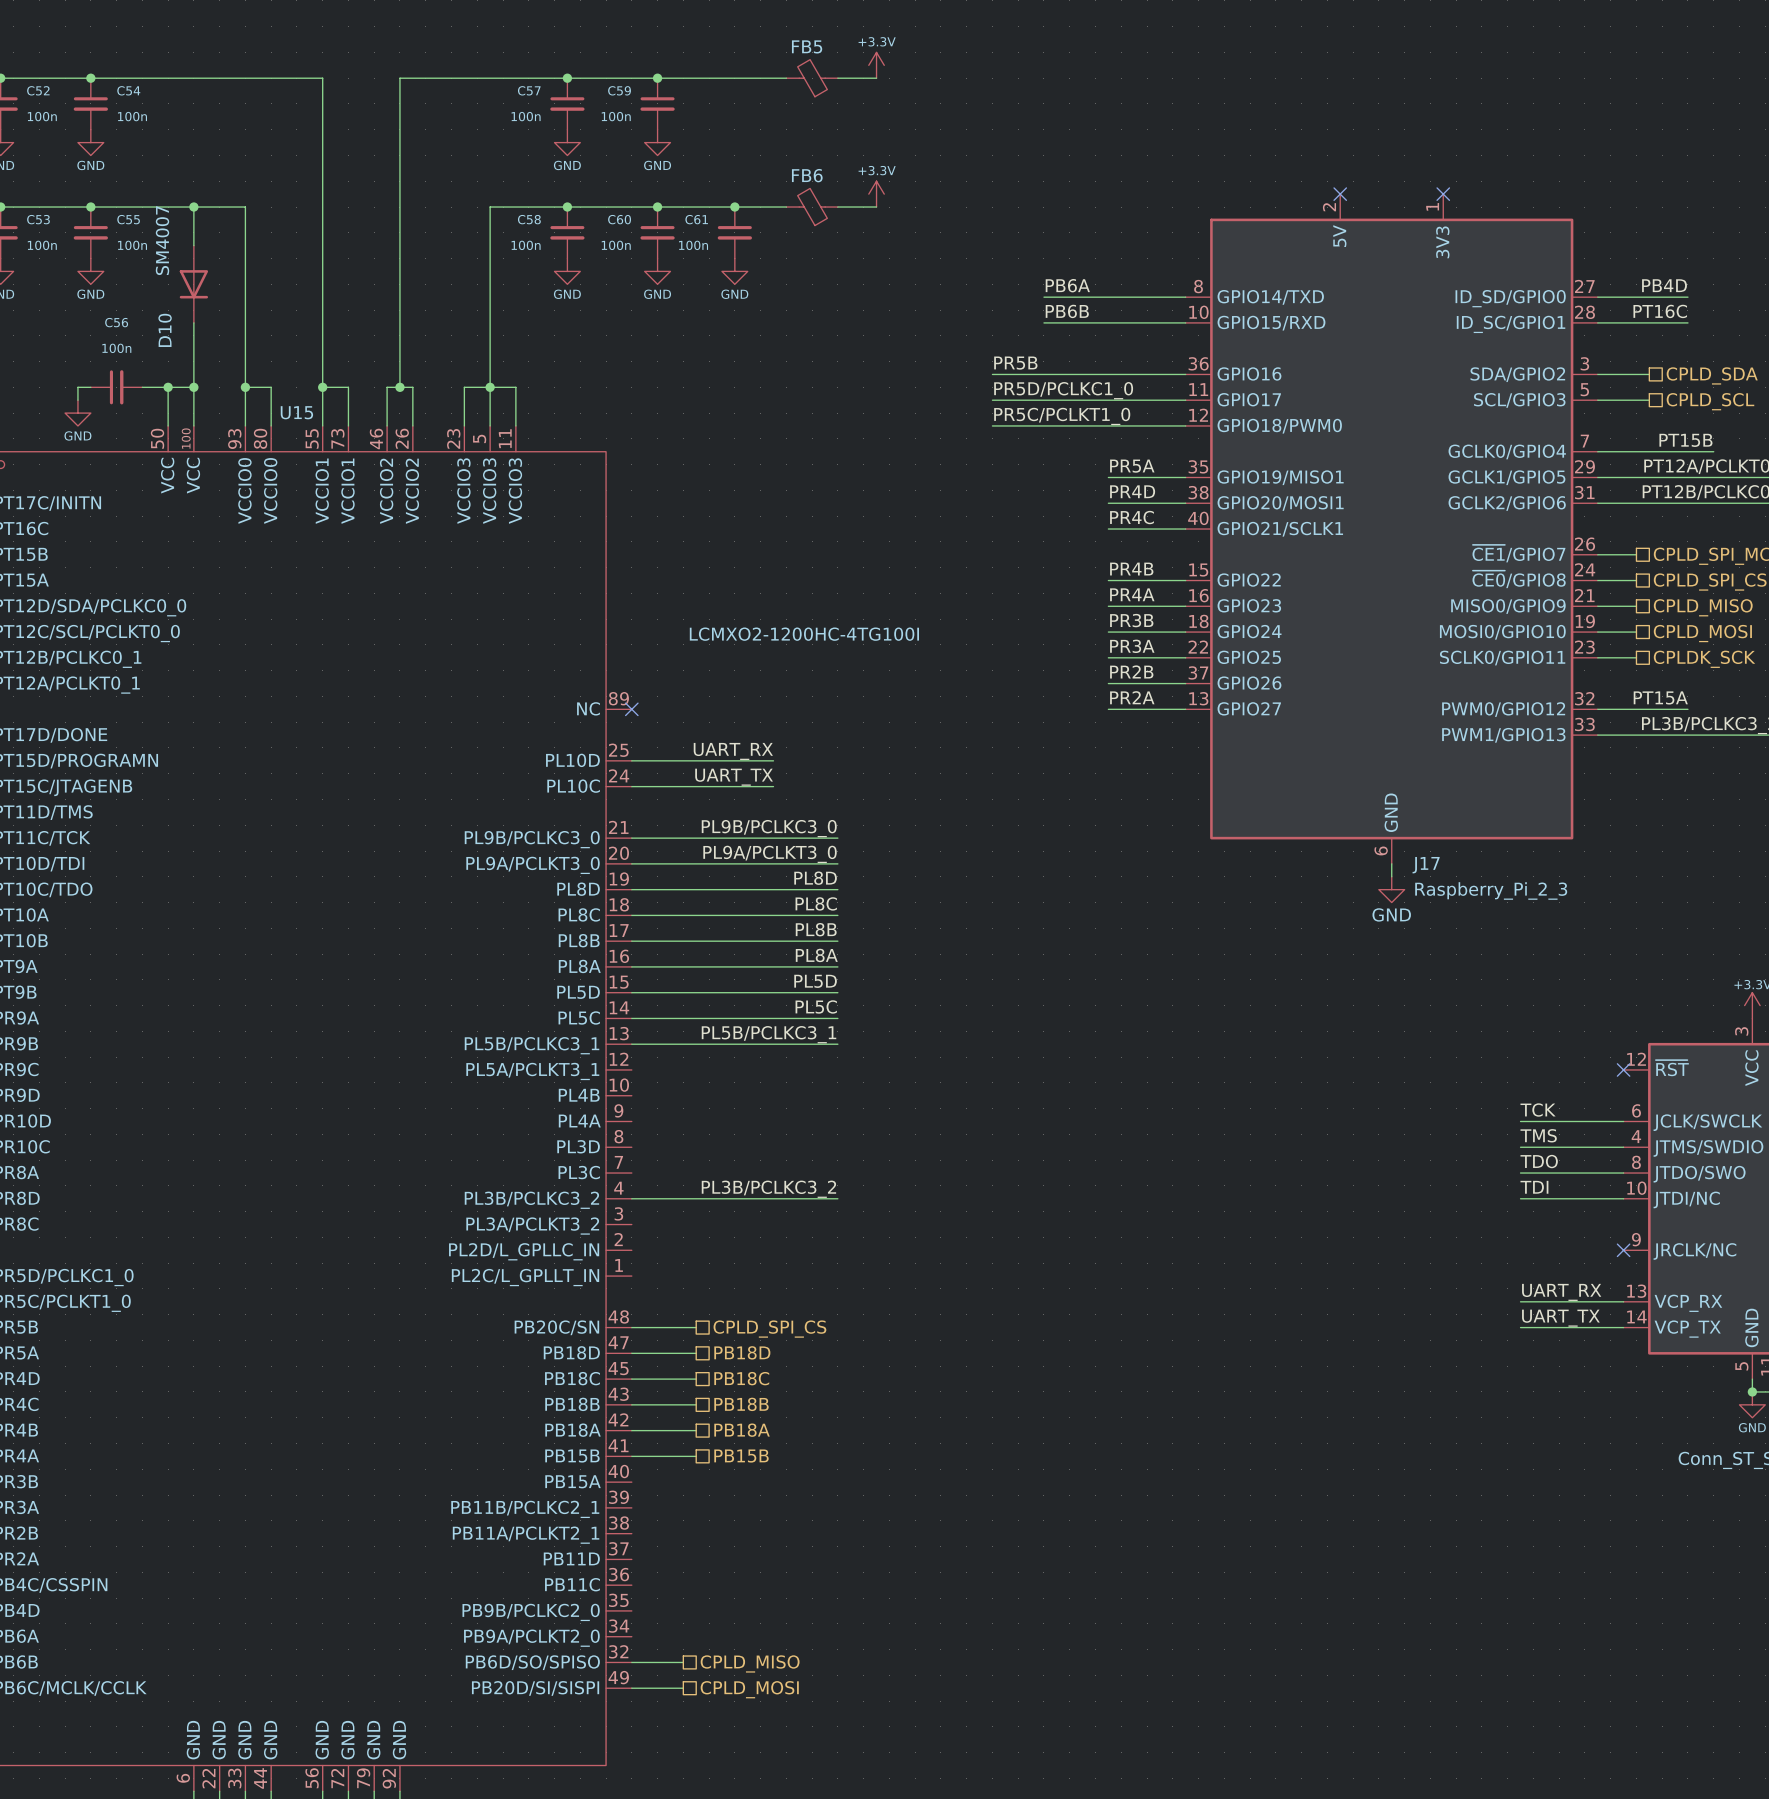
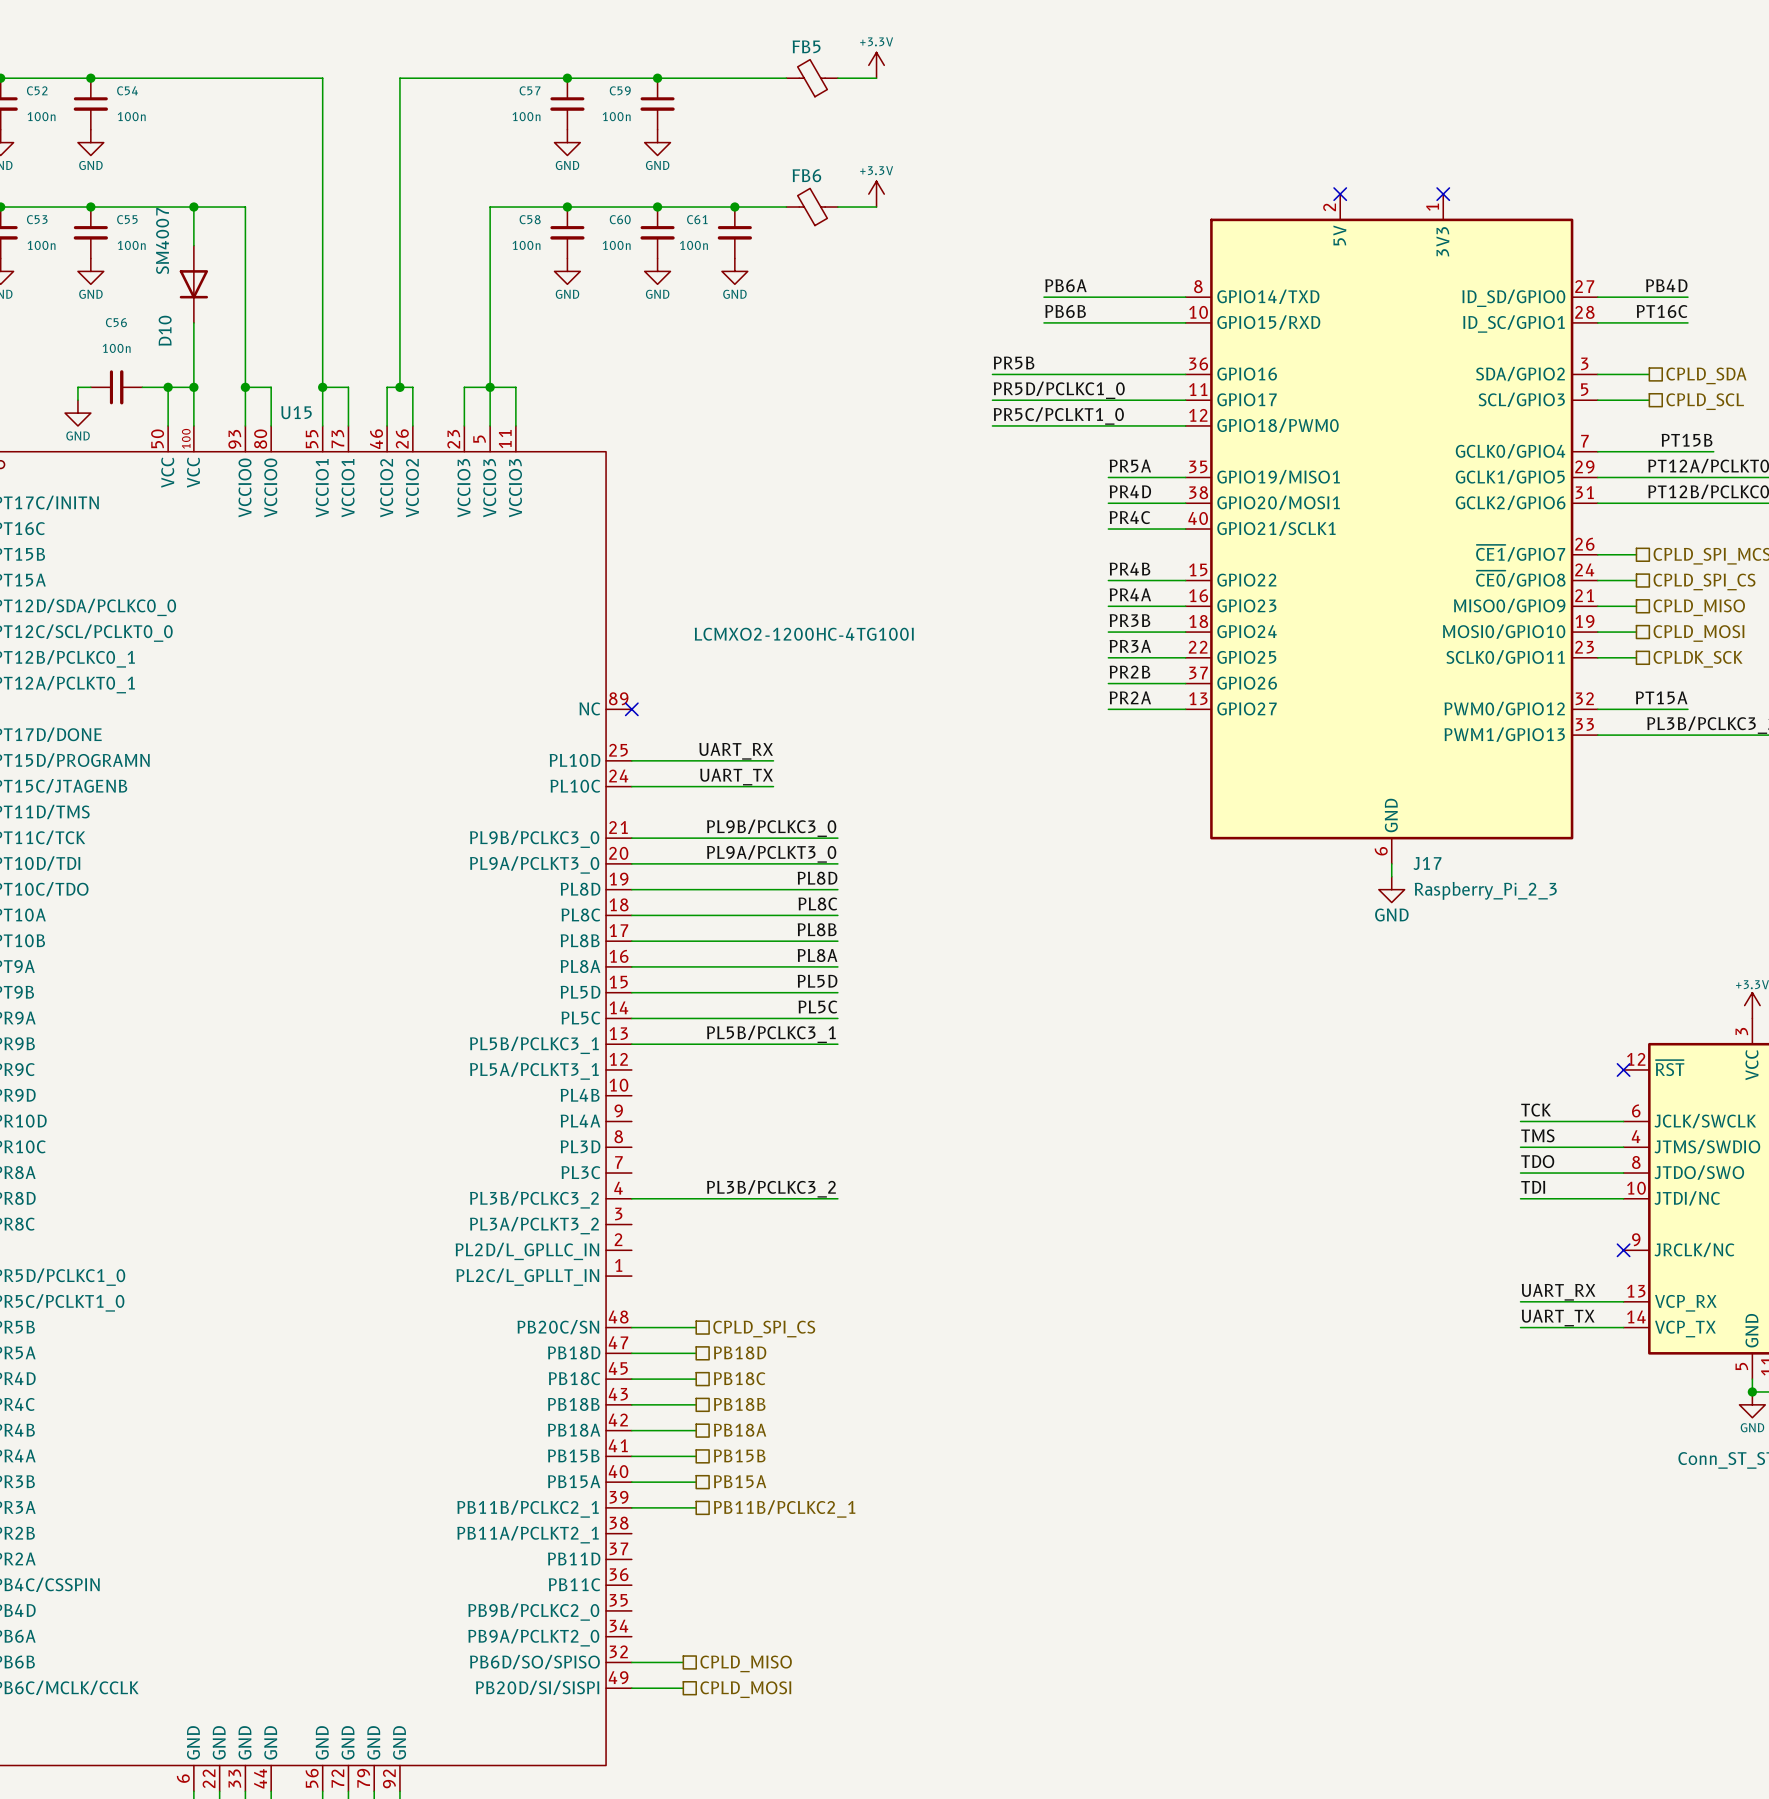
hierarchical label: none -> PB15A (740, 1481)
wire: none -> (631, 1482) (696, 1482)
wire: none -> (631, 1507) (696, 1507)
hierarchical label: none -> PB11B/PCLKC2_1 (784, 1509)

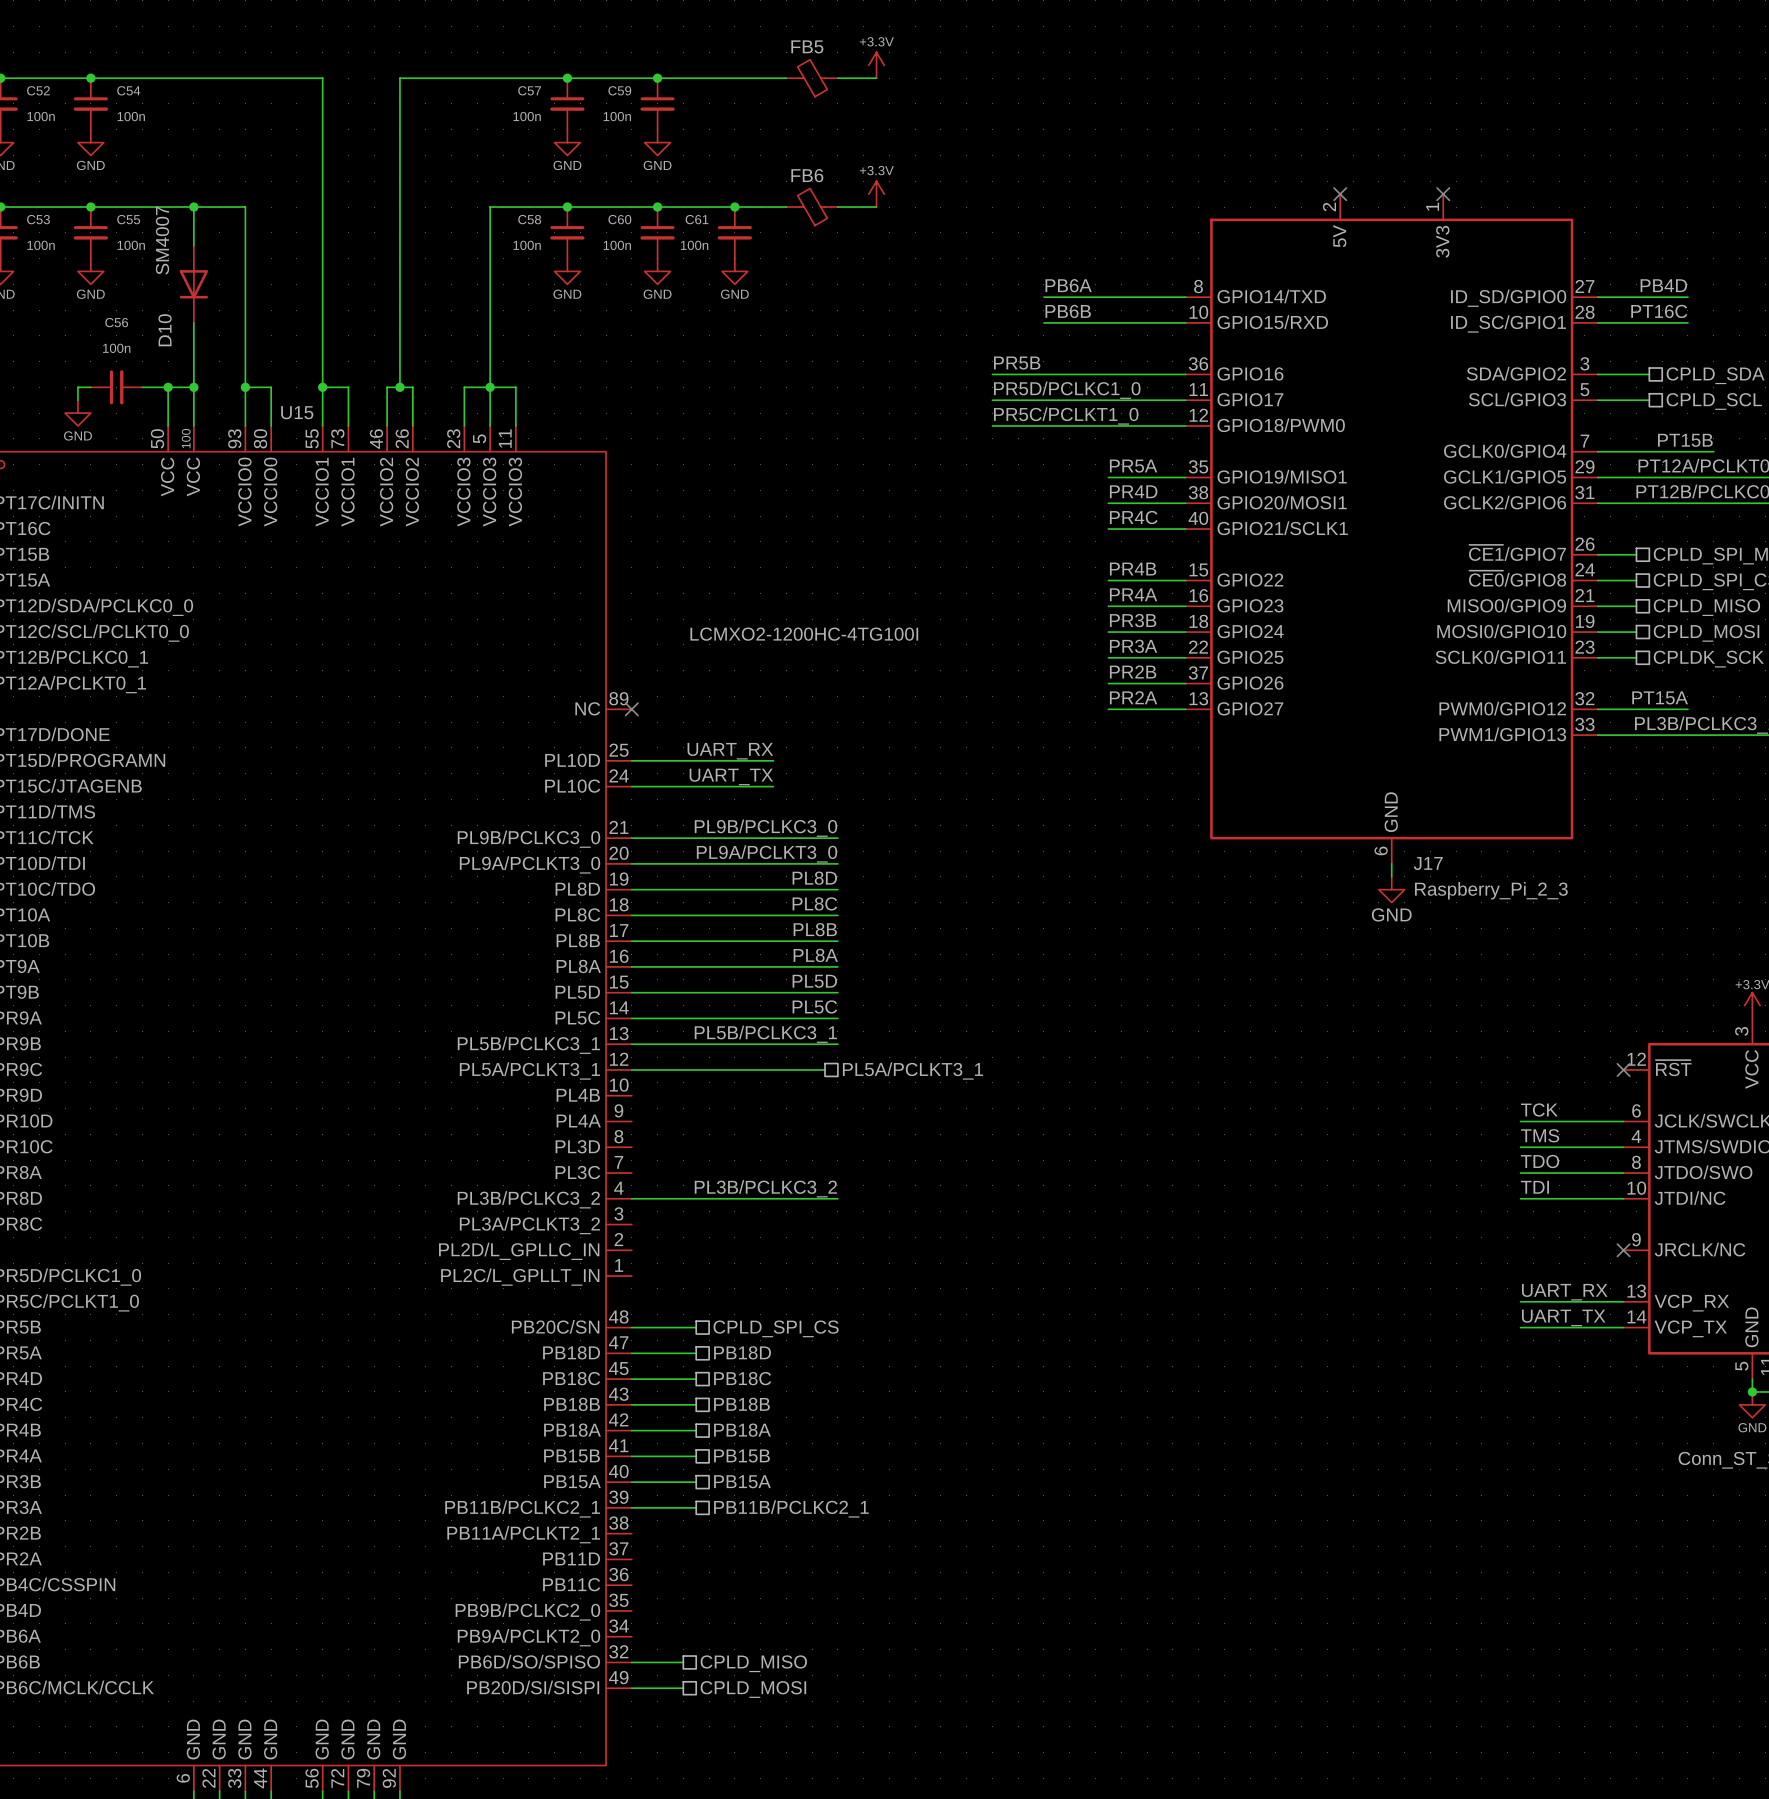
wire: none -> (631, 1069) (825, 1069)
hierarchical label: none -> PL5A/PCLKT3_1 (912, 1071)

